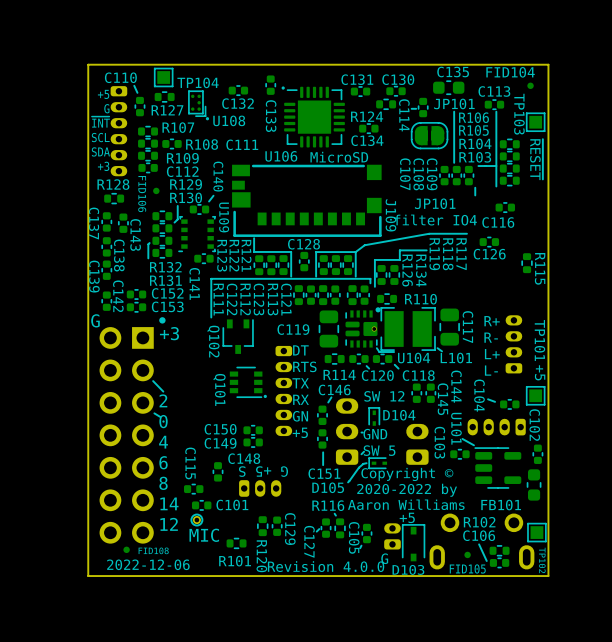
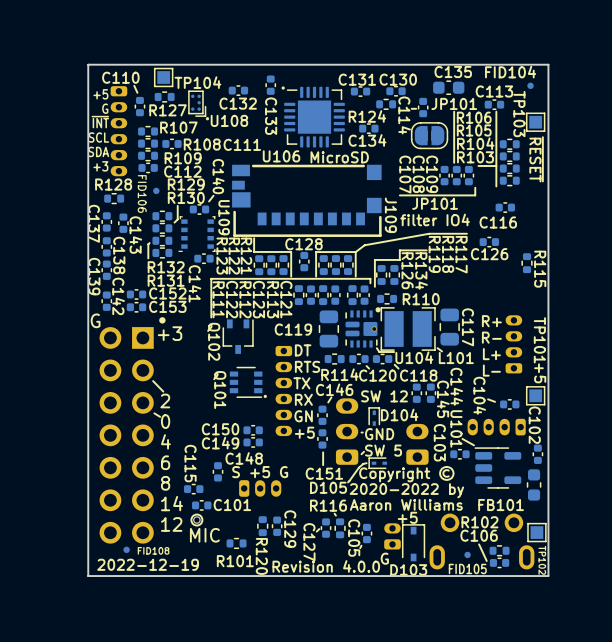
line: none -> (475, 195) (399, 195)
text: G +5 S (263, 471) -> S +5 G (260, 472)
text: 2022-12-06 (148, 564) -> 2022-12-19 (148, 564)

